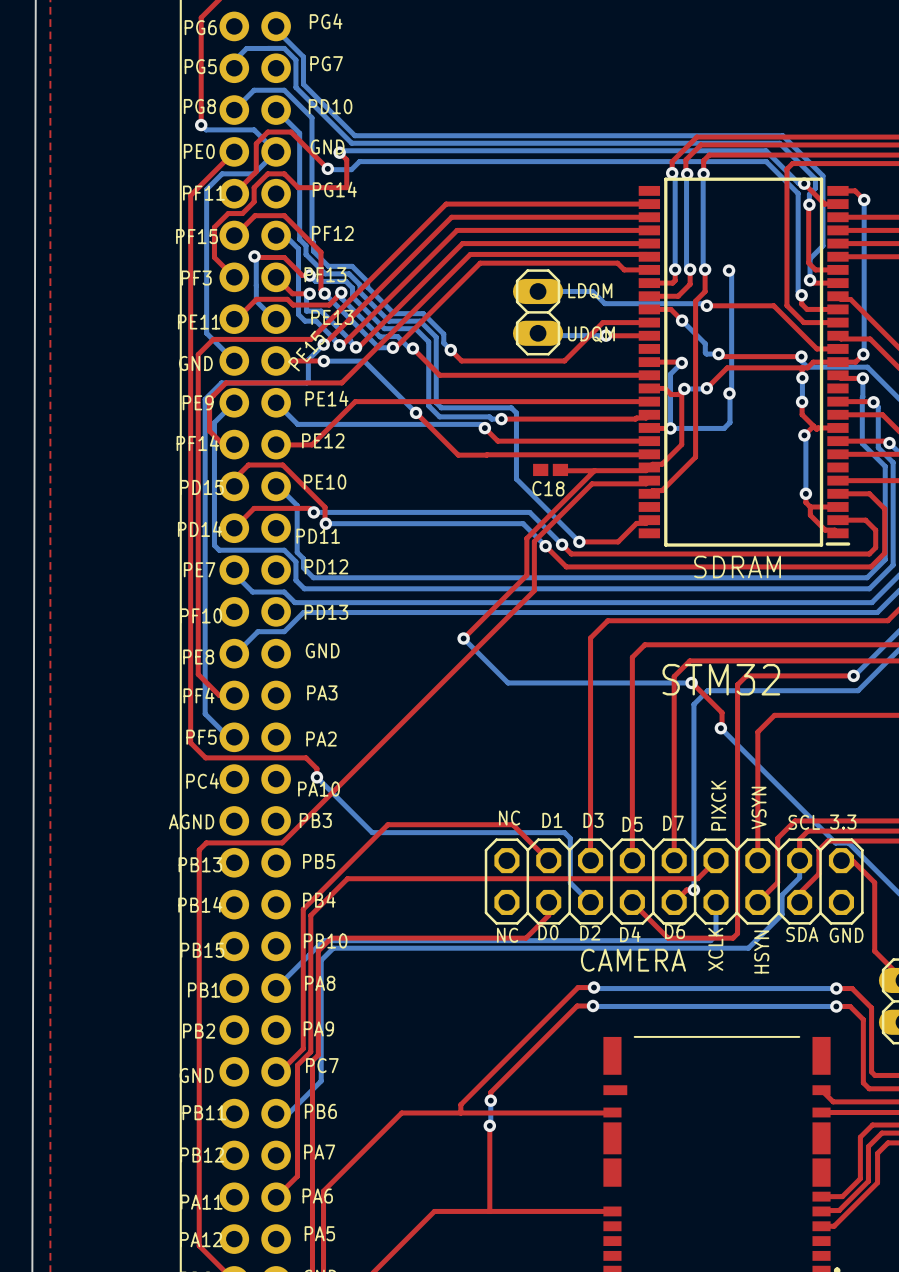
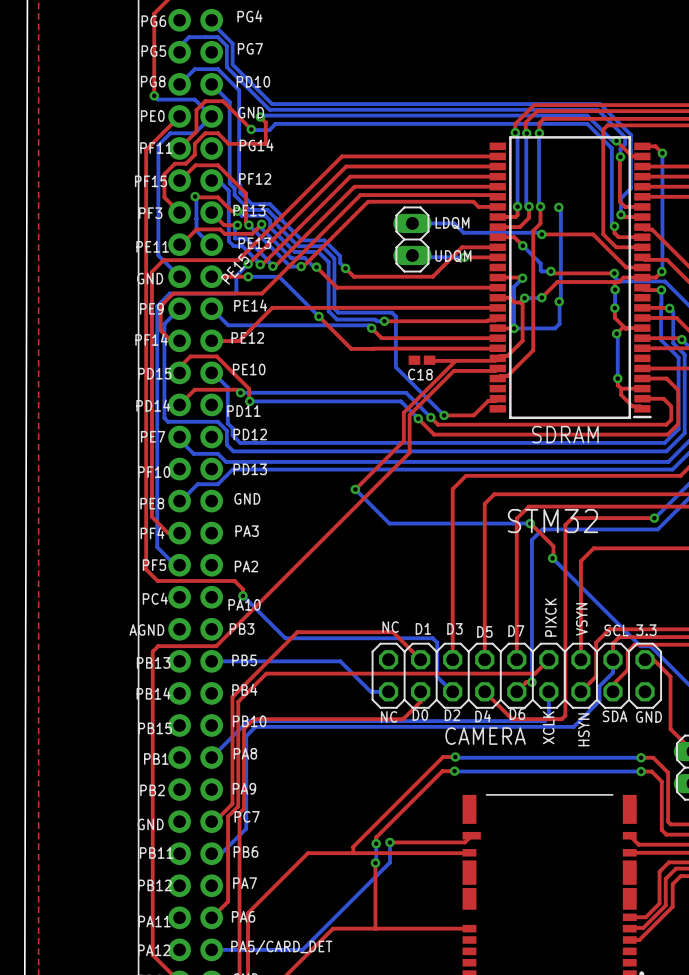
bottom track: none -> (211, 661) (340, 661) (370, 691) (388, 691)
top track: none -> (471, 835) (464, 842) (389, 842)
bottom track: none -> (389, 842) (389, 862) (302, 949) (211, 949)
via: none -> (389, 842)
text: PA5 (319, 1233) -> PA5/CARD_DET (281, 947)

